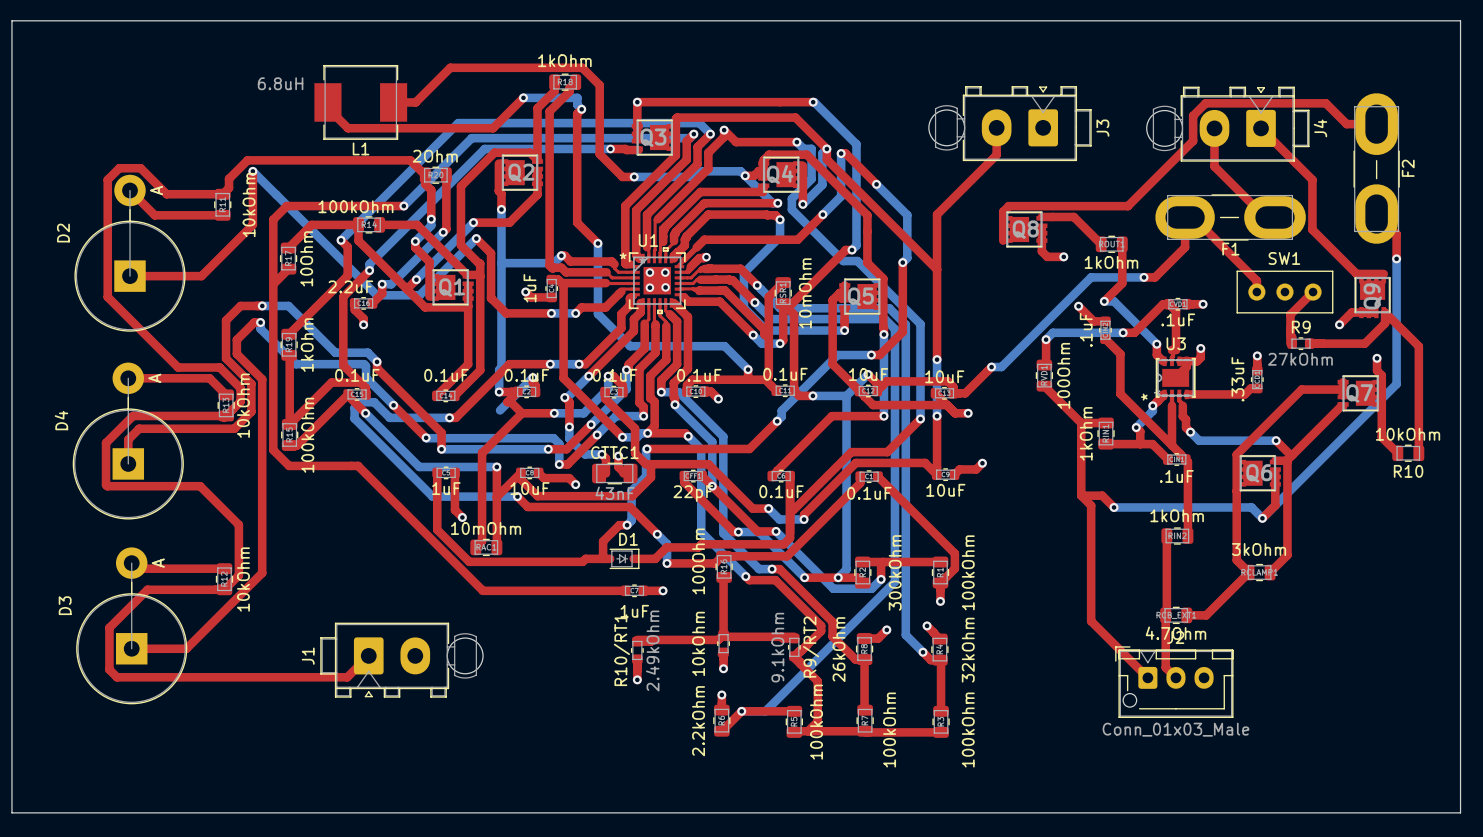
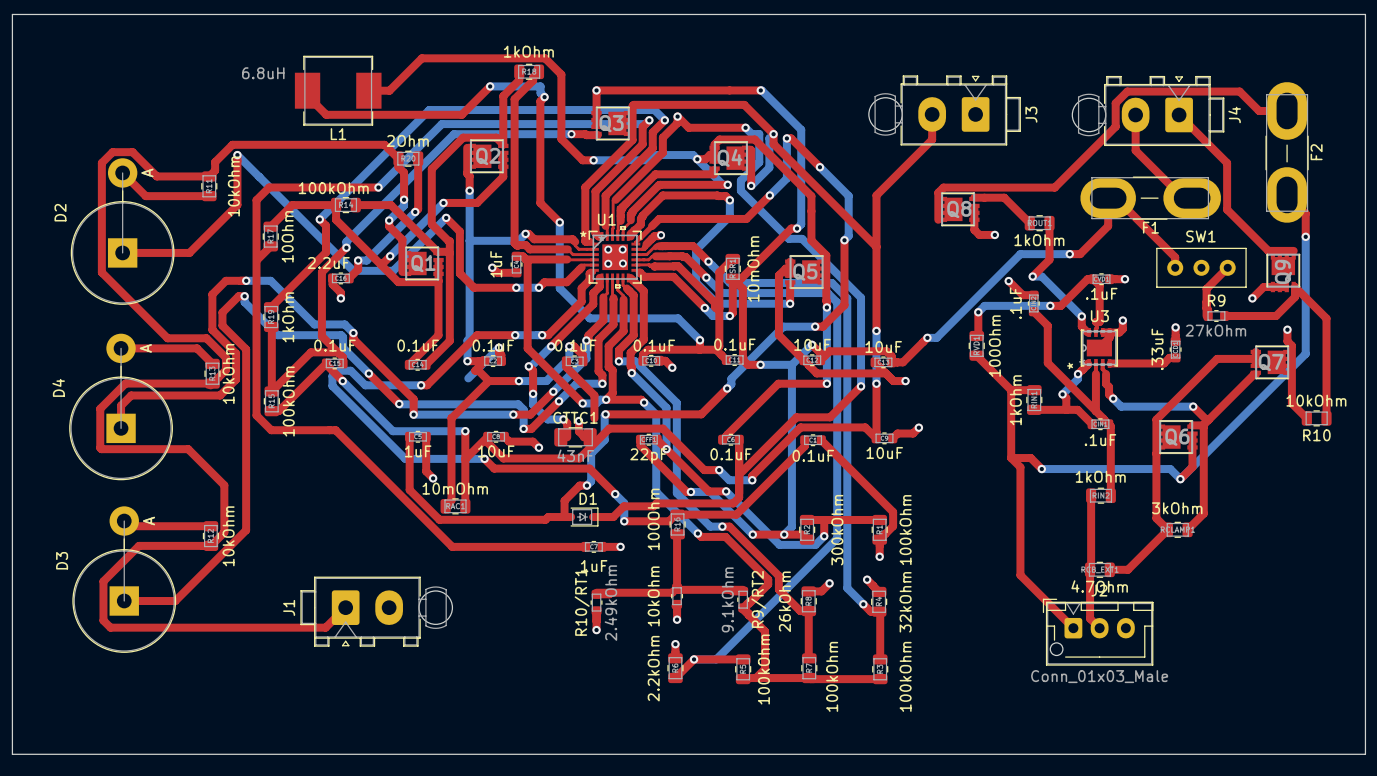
top track: (635, 453) (645, 464) (651, 464) (651, 477) (632, 496) (619, 496) -> (609, 428) (579, 458)

